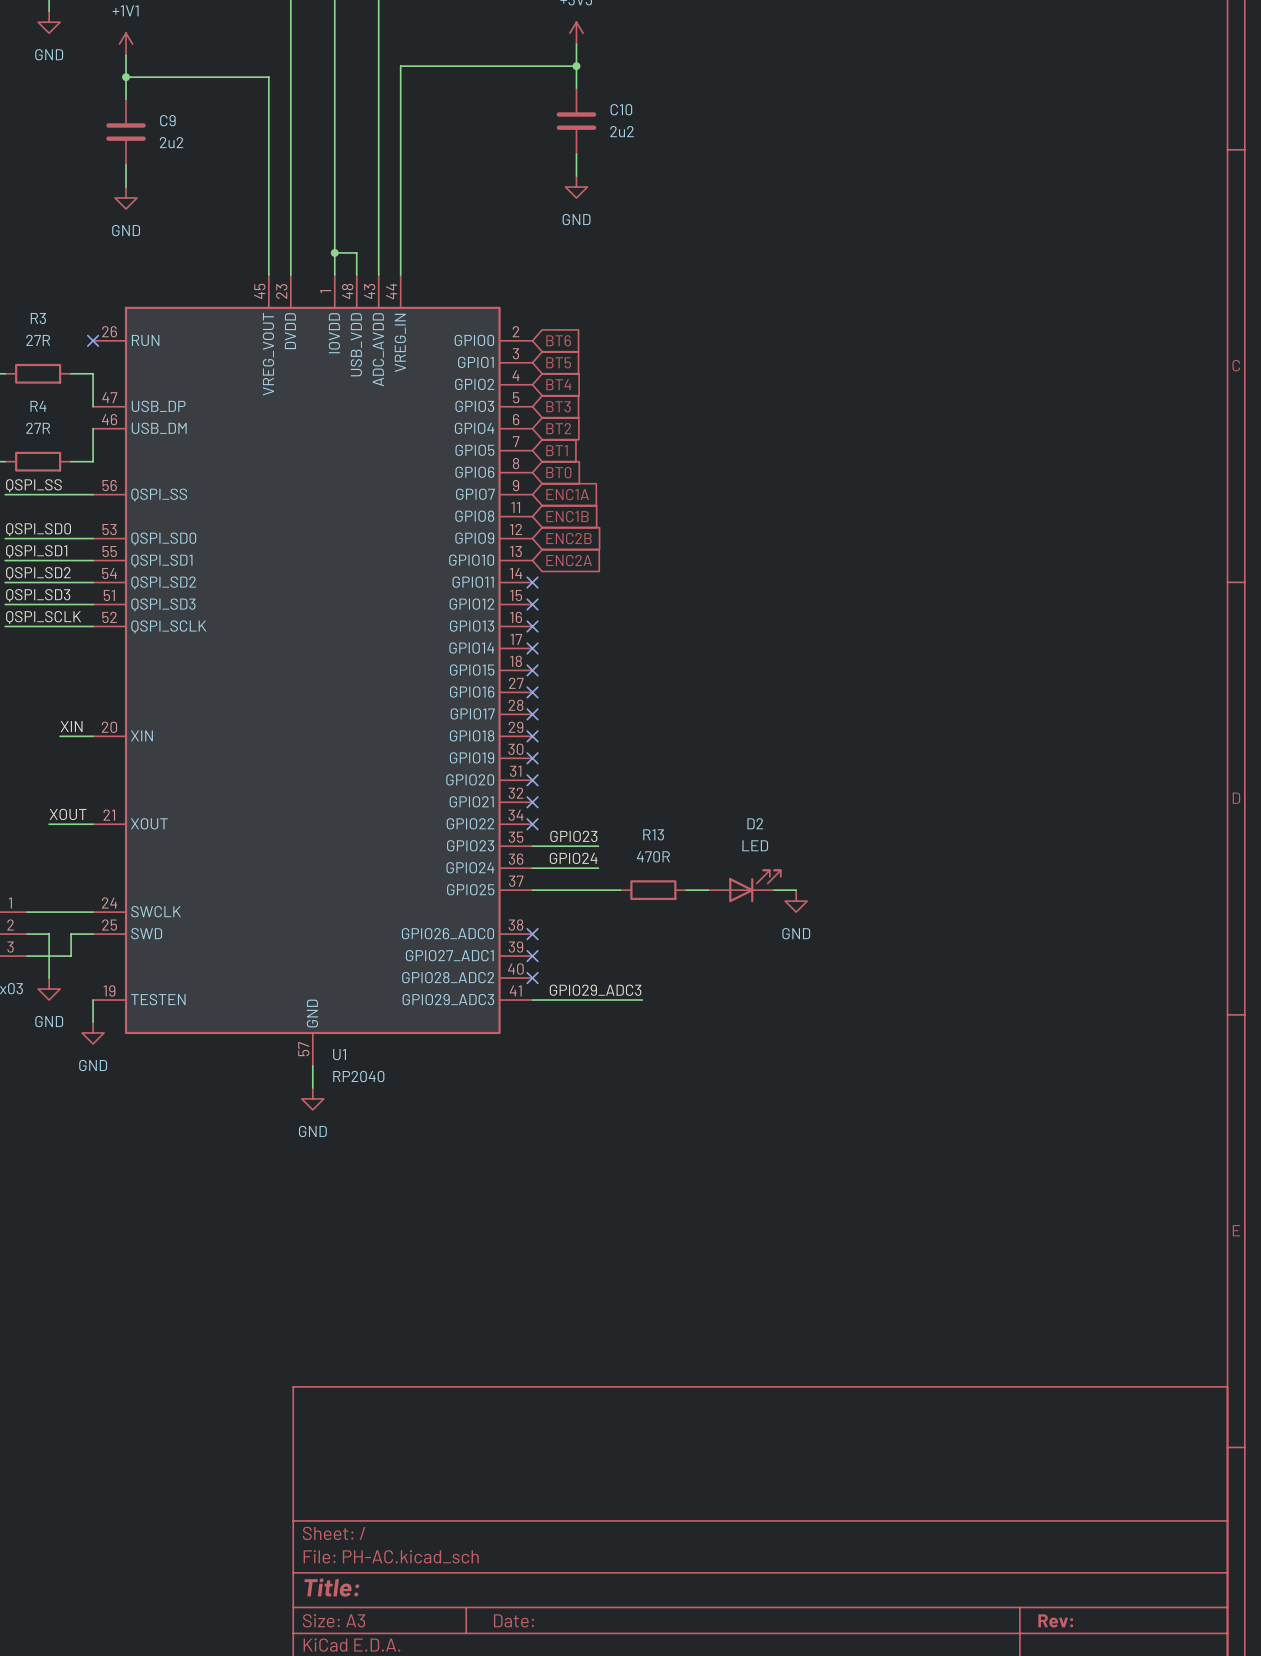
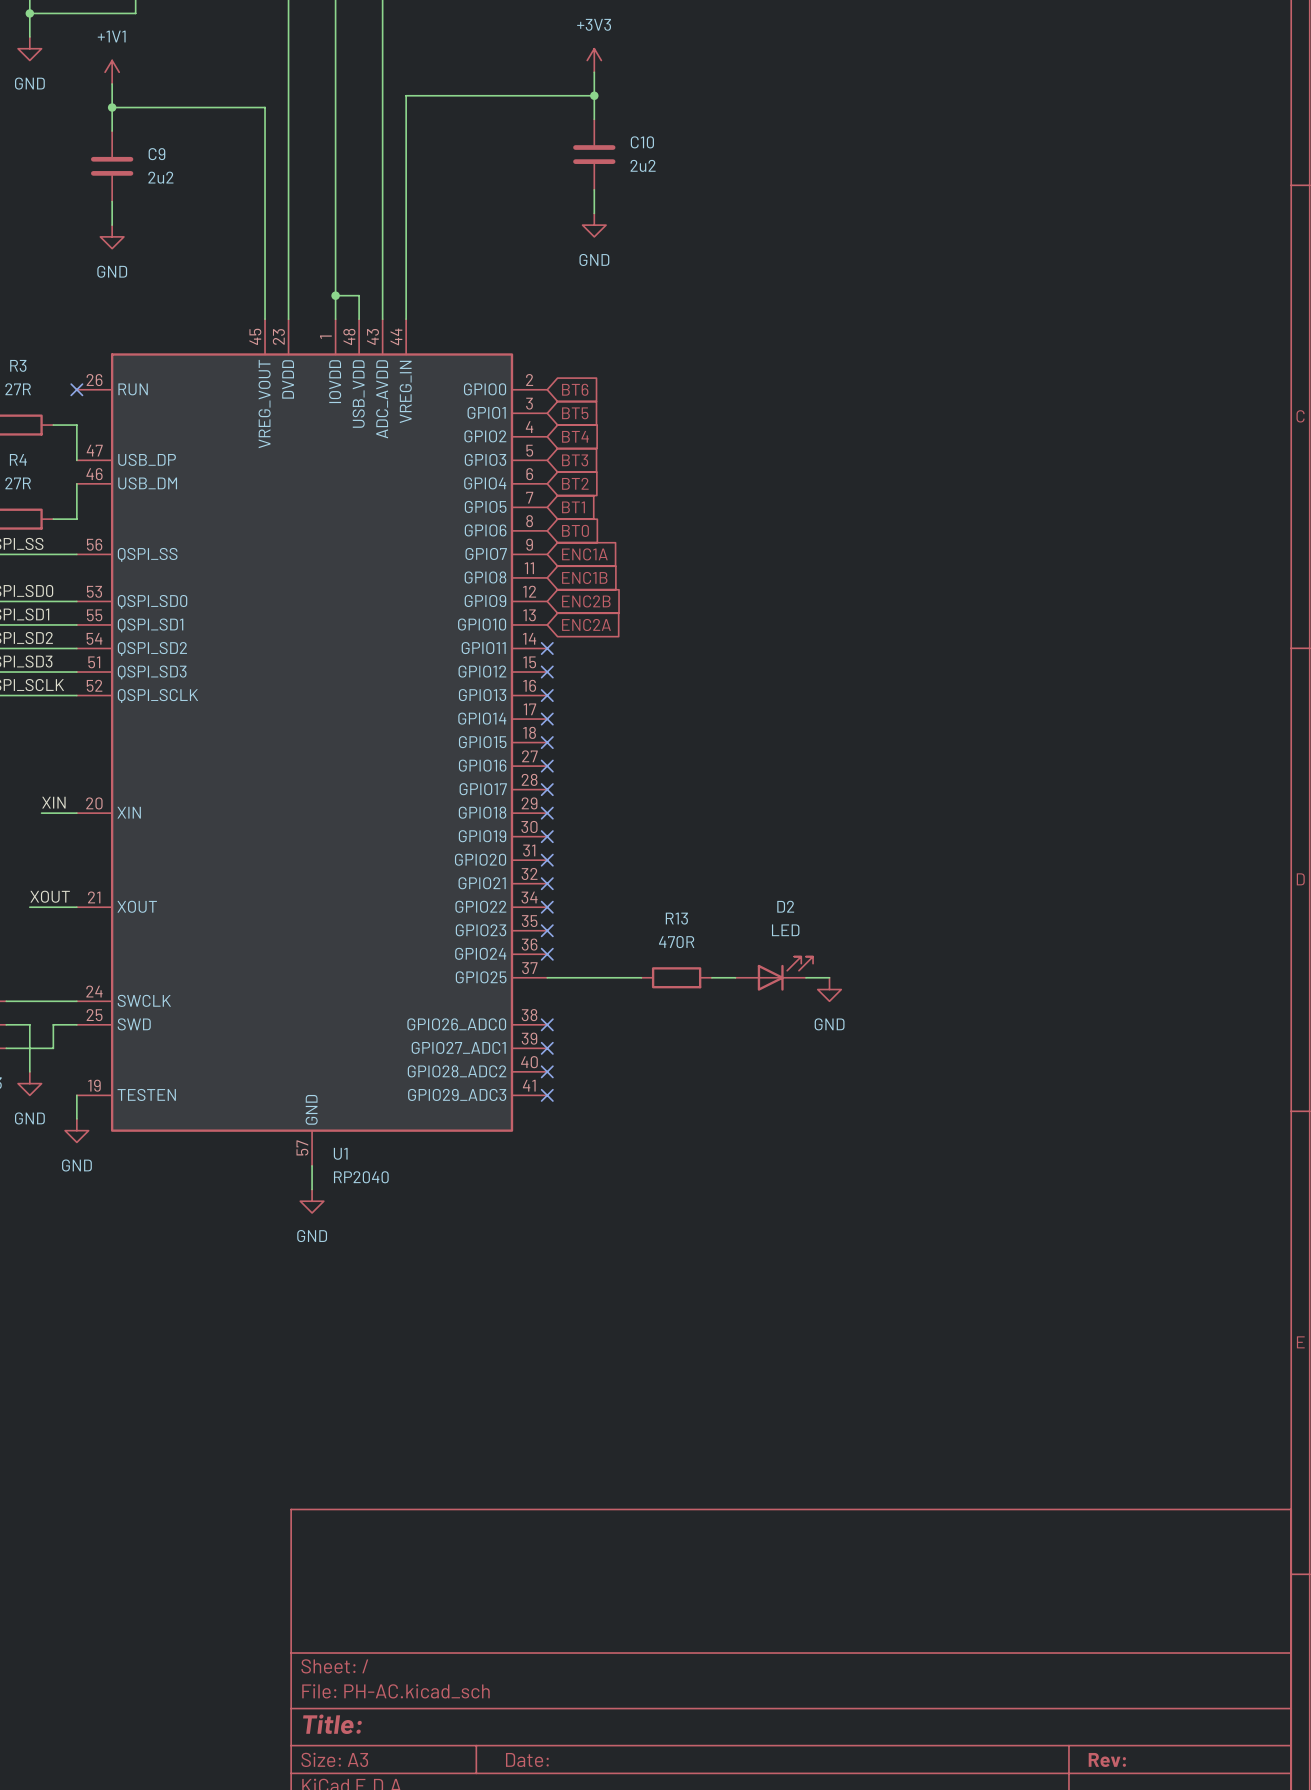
label: GPIO23 (573, 836) -> none
wire: (532, 846) (598, 846) -> none
no-connect mark: none -> (547, 930)
label: GPIO24 (573, 858) -> none
wire: (532, 868) (598, 868) -> none
no-connect mark: none -> (547, 954)
label: GPIO29_ADC3 (595, 990) -> none
wire: (532, 1000) (642, 1000) -> none
no-connect mark: none -> (547, 1095)

